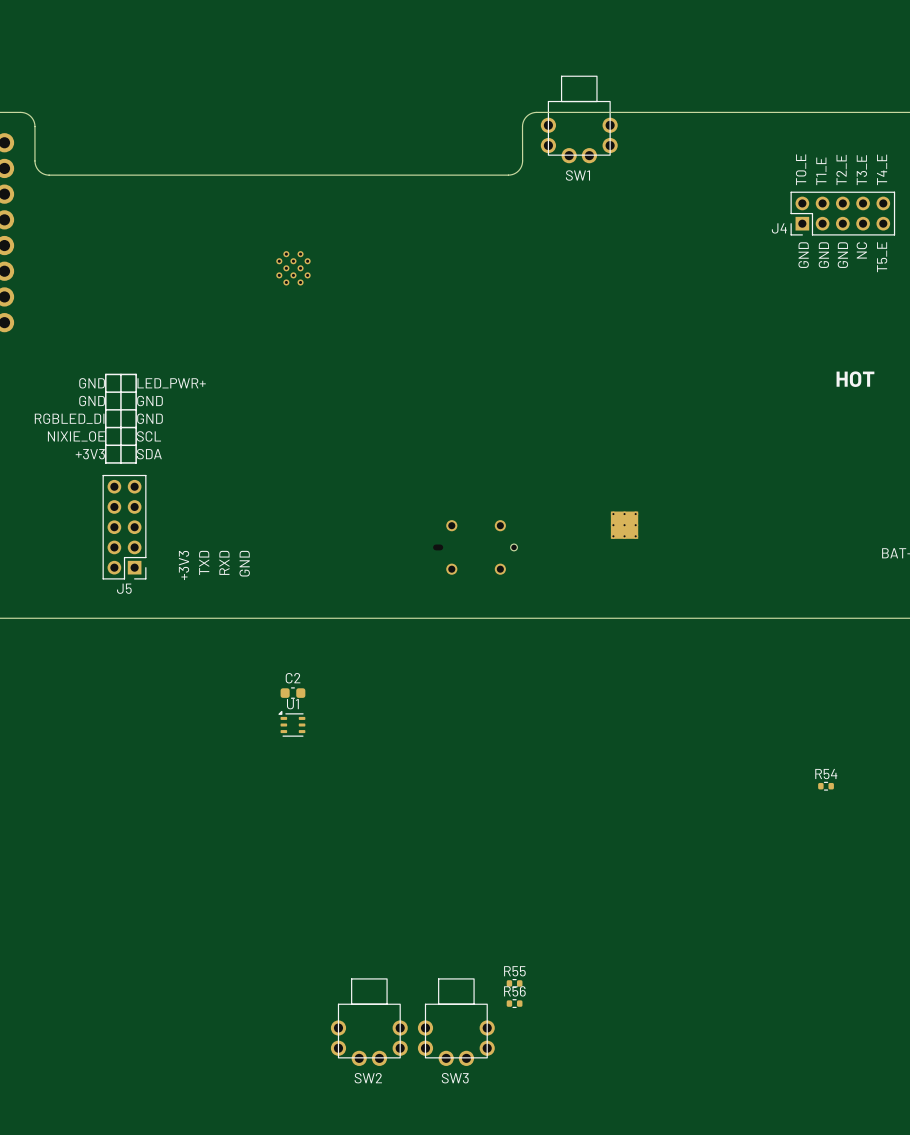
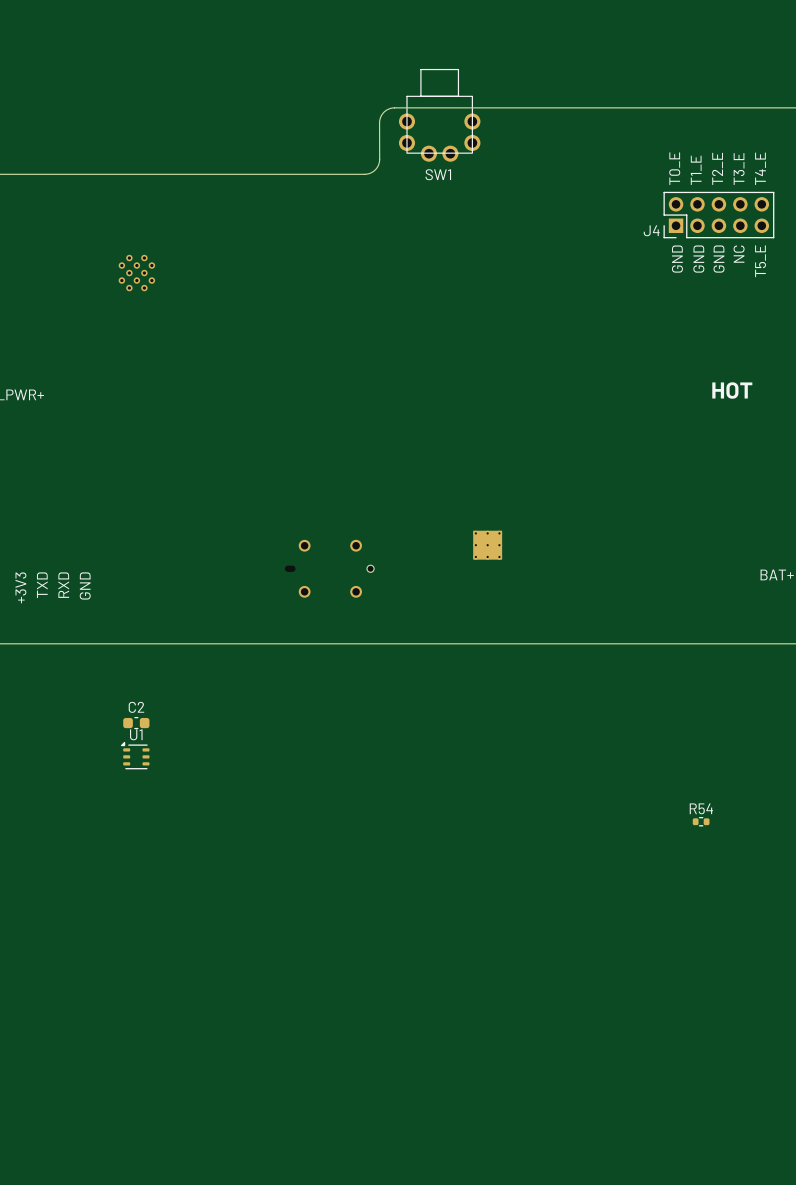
R55: (514, 983) -> none
R56: (514, 1003) -> none
SW2: (369, 1022) -> none
SW3: (456, 1022) -> none

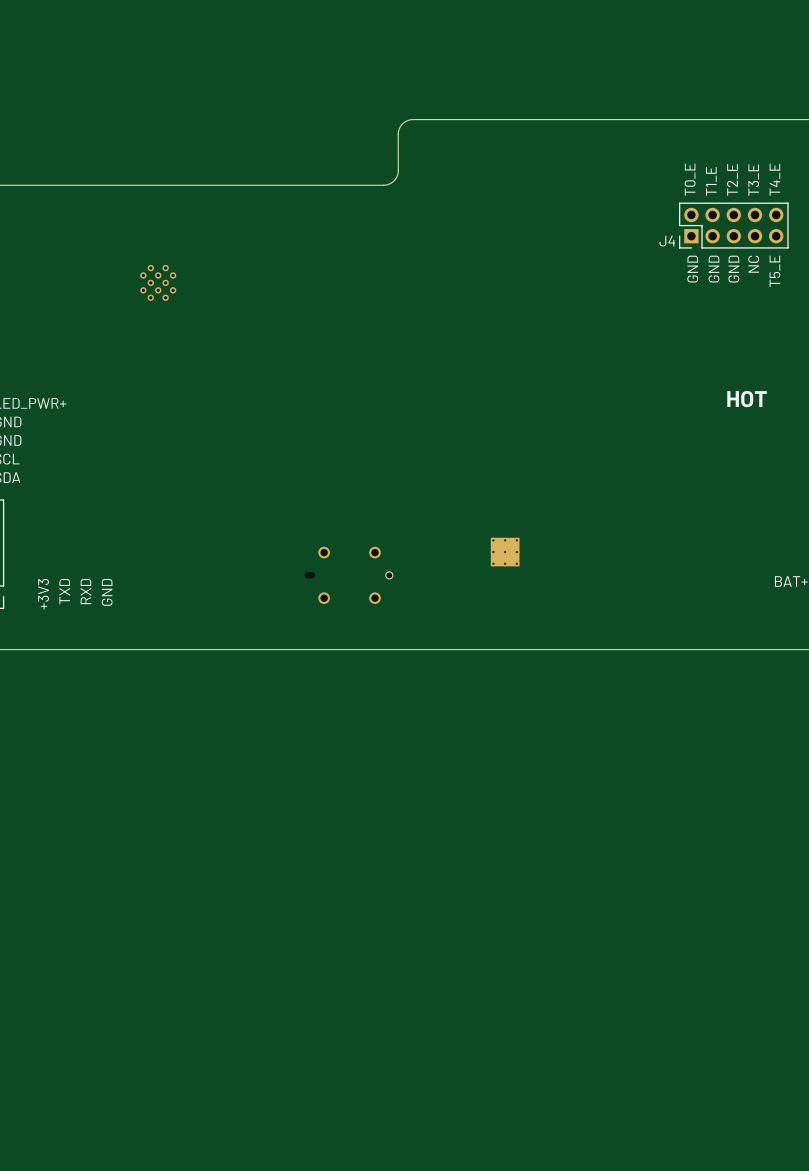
SW1: (439, 115) -> none
C2: (136, 723) -> none
U1: (135, 755) -> none
R54: (701, 821) -> none

